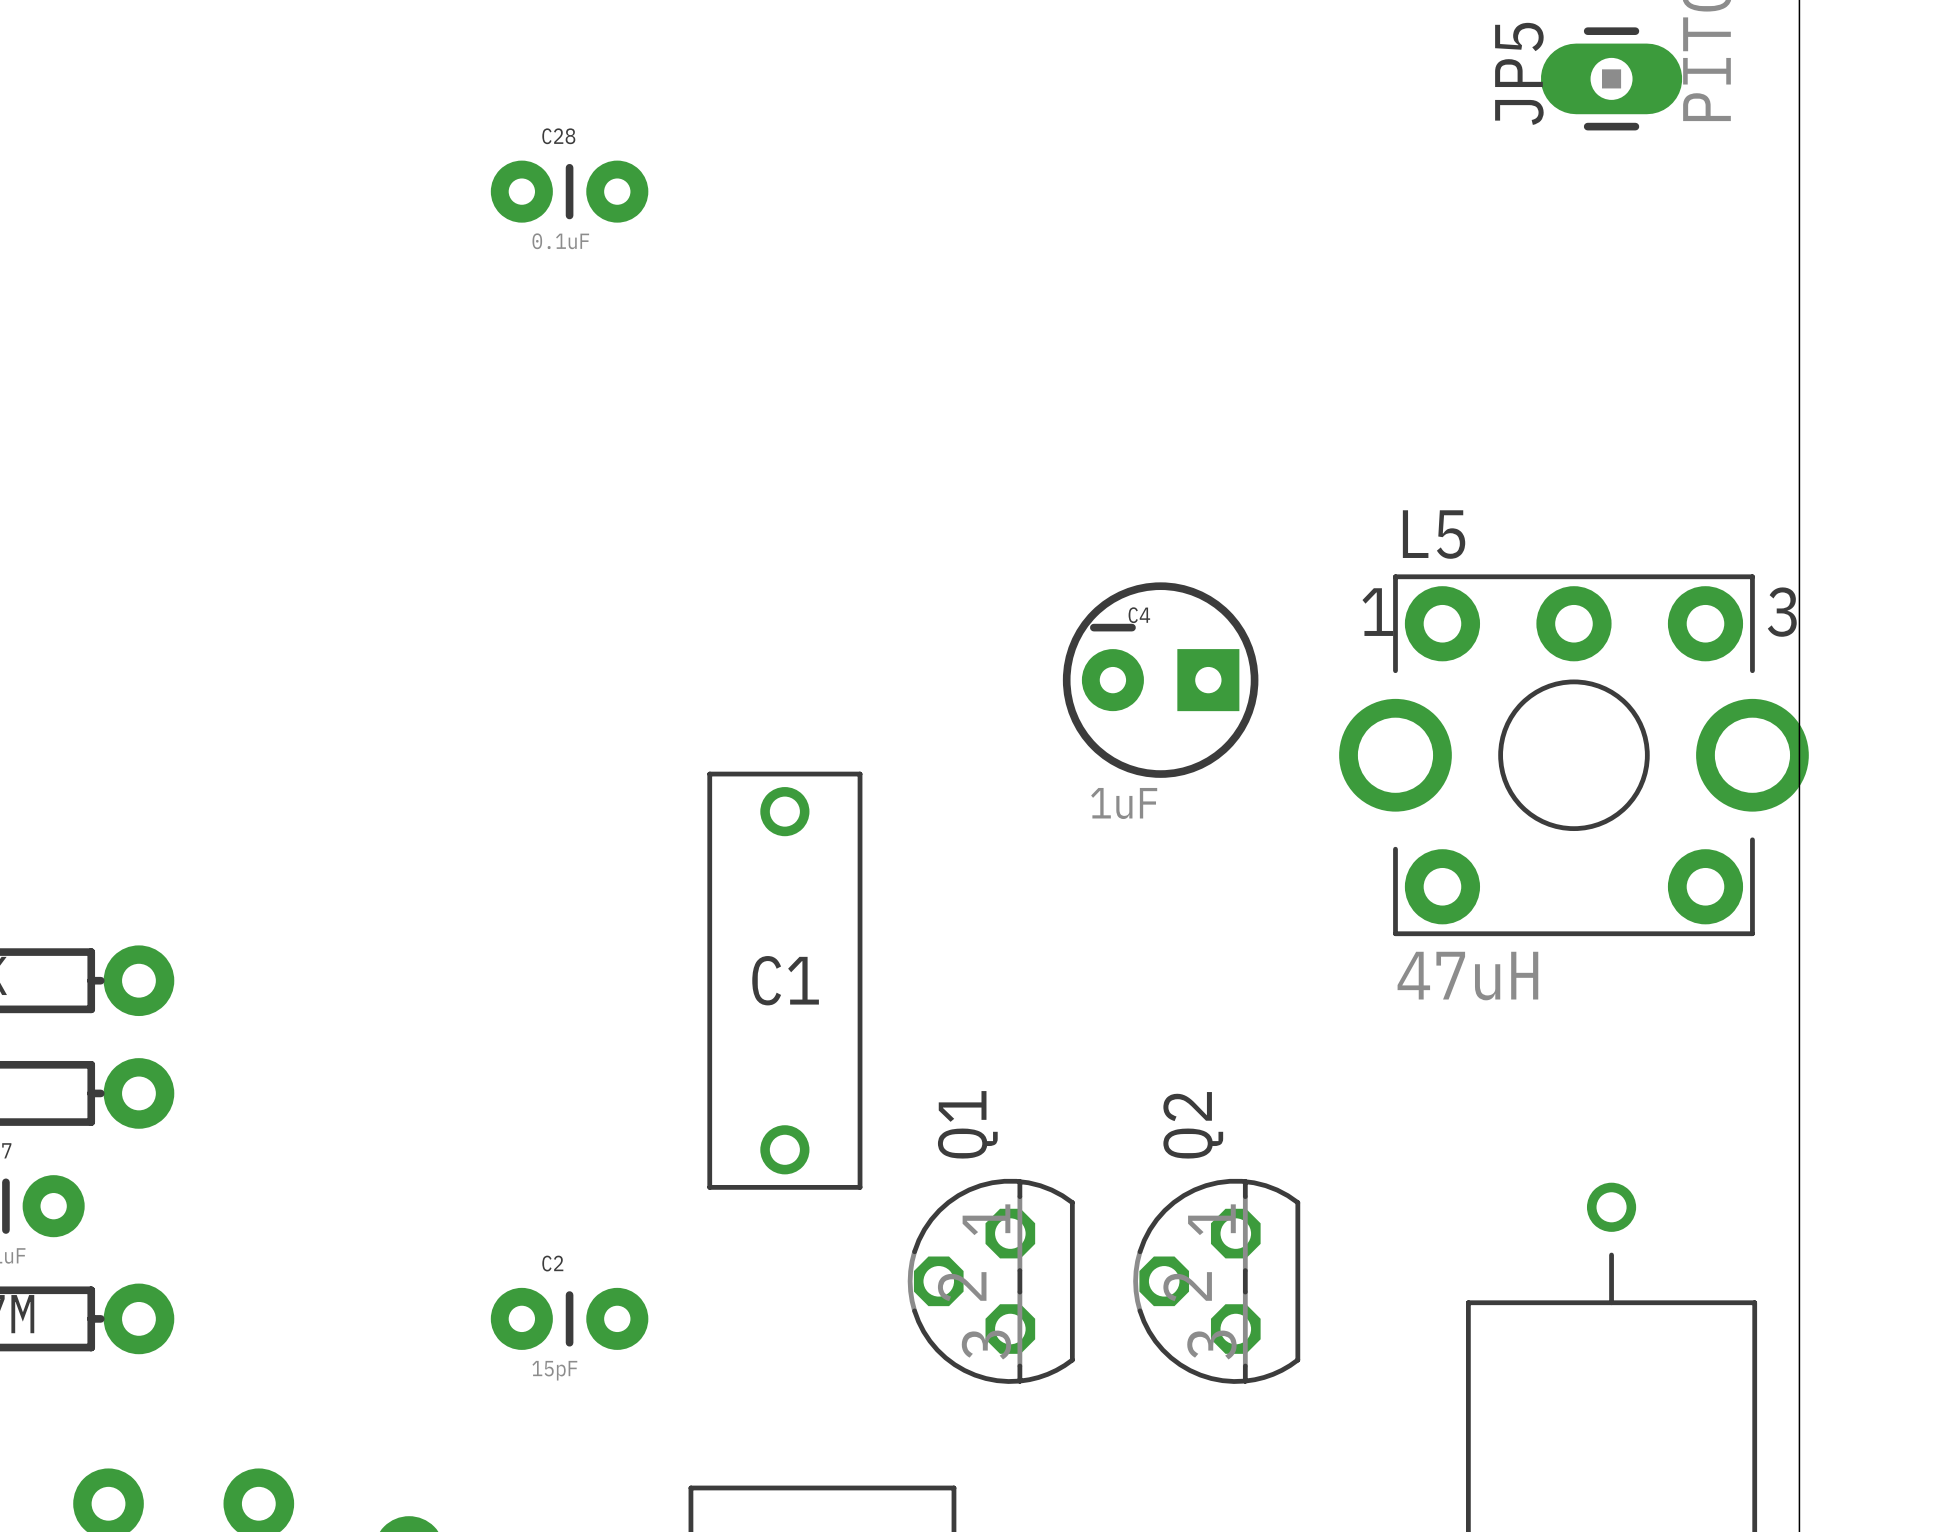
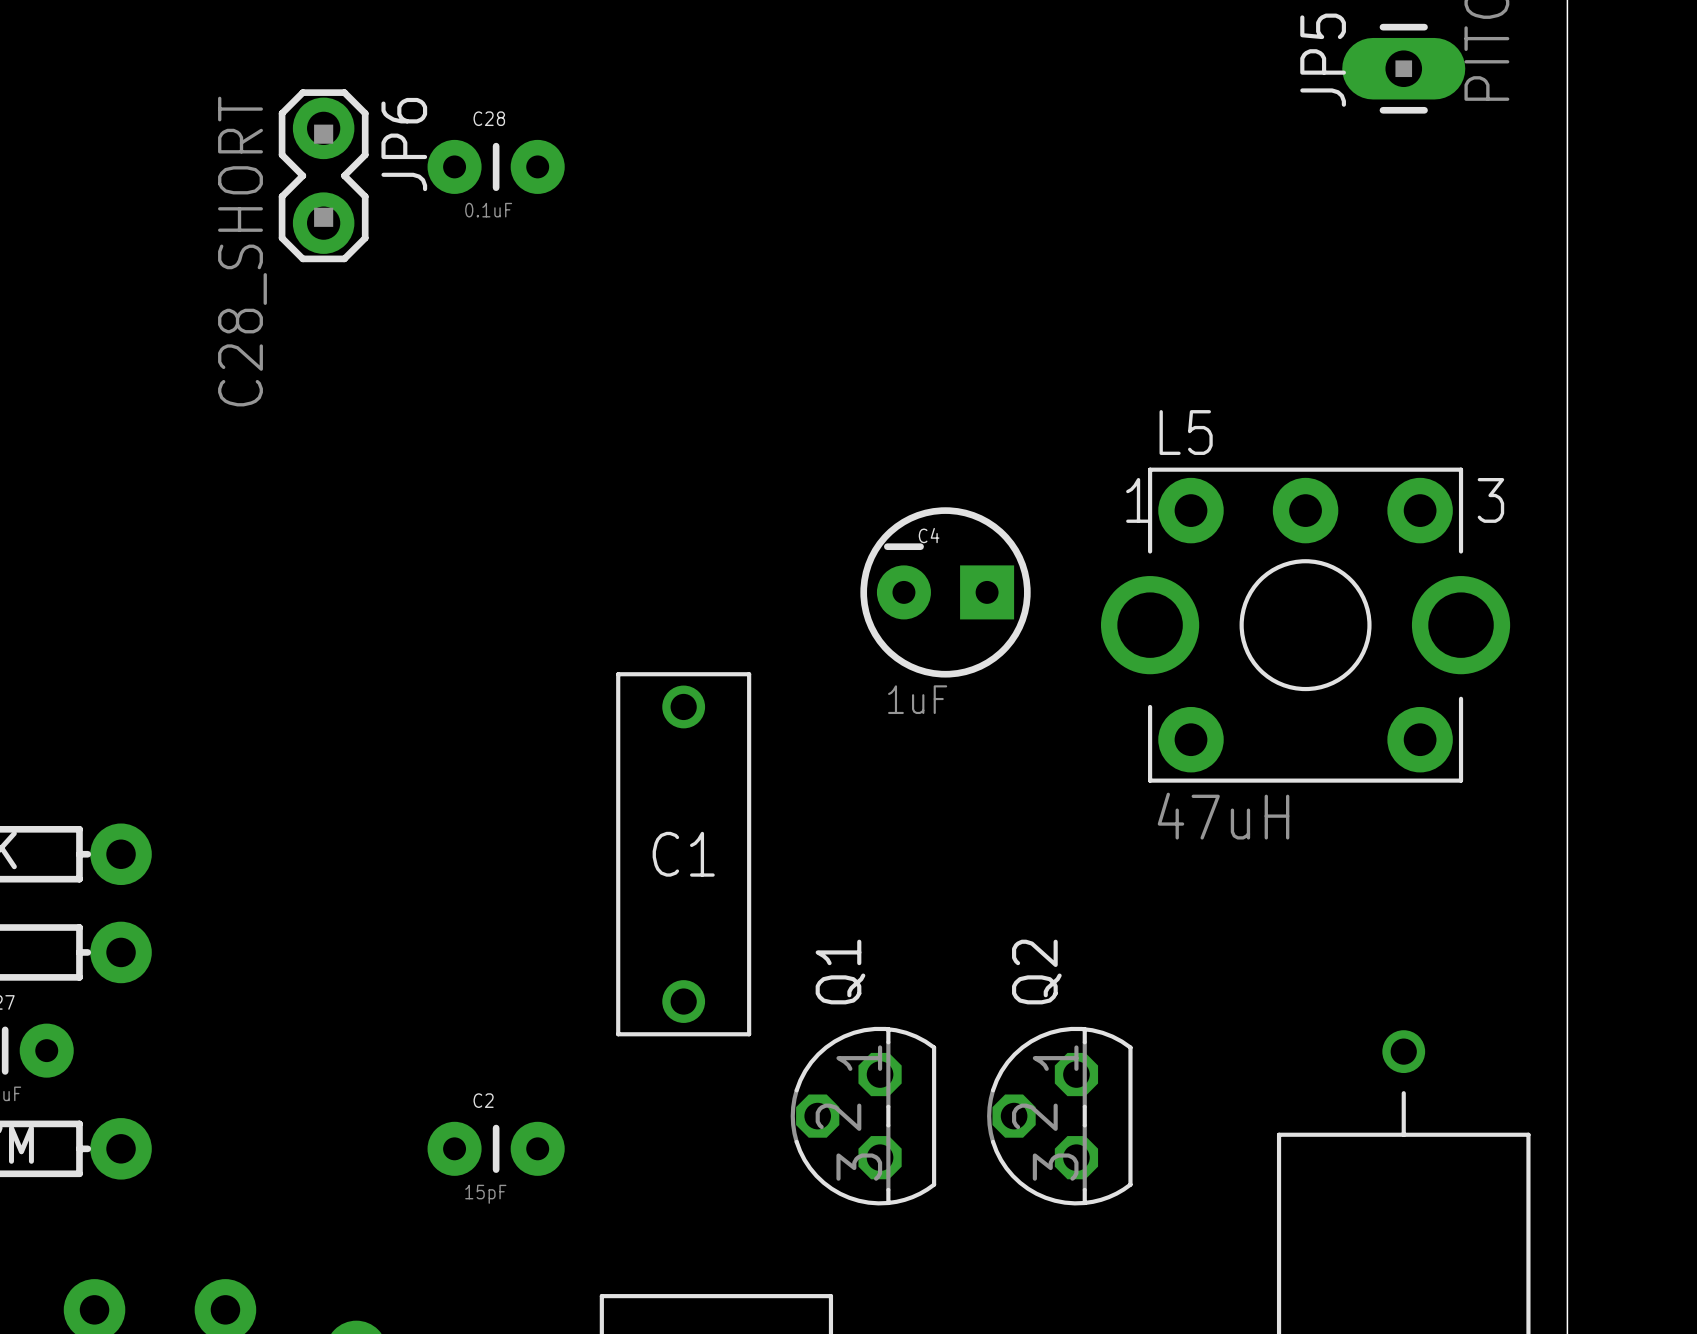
JP6: none -> C28_SHORT (323, 175)
C4 position: (1160, 680) -> (945, 592)
L5 position: (1573, 755) -> (1305, 625)

